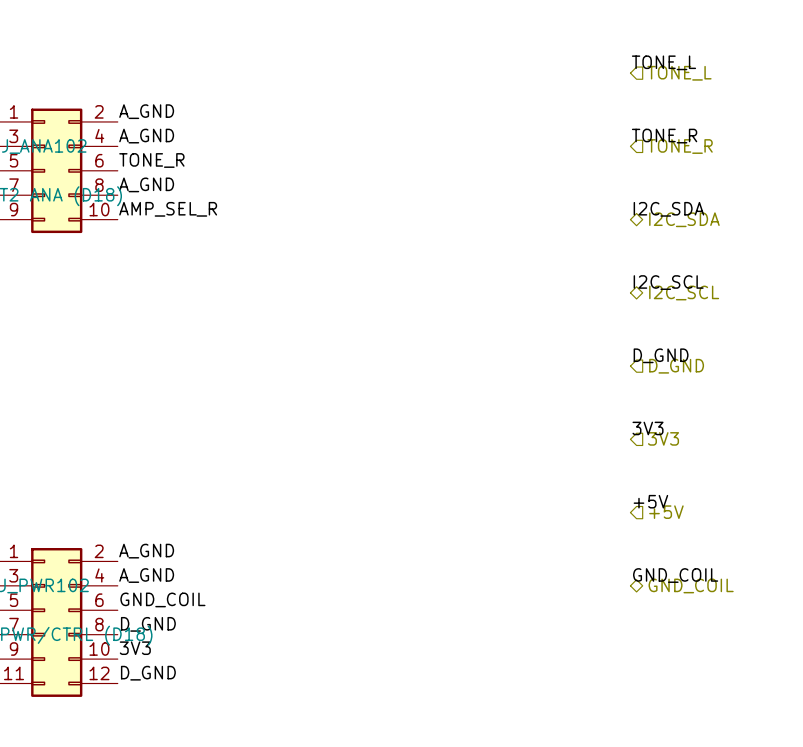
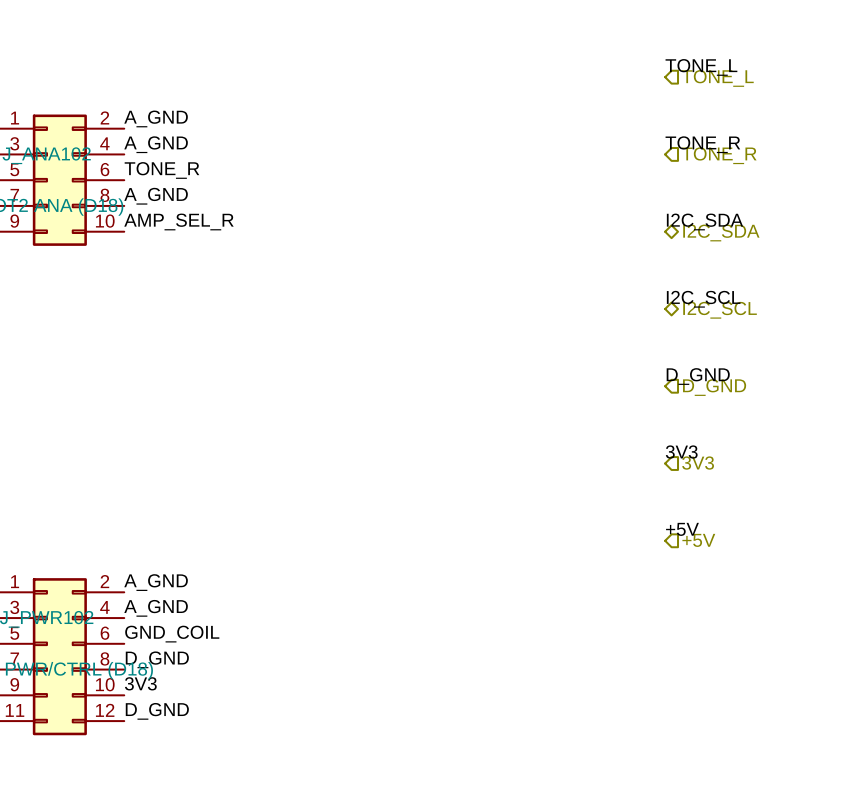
label: GND_COIL (675, 575) -> none
hierarchical label: GND_COIL (691, 585) -> none

